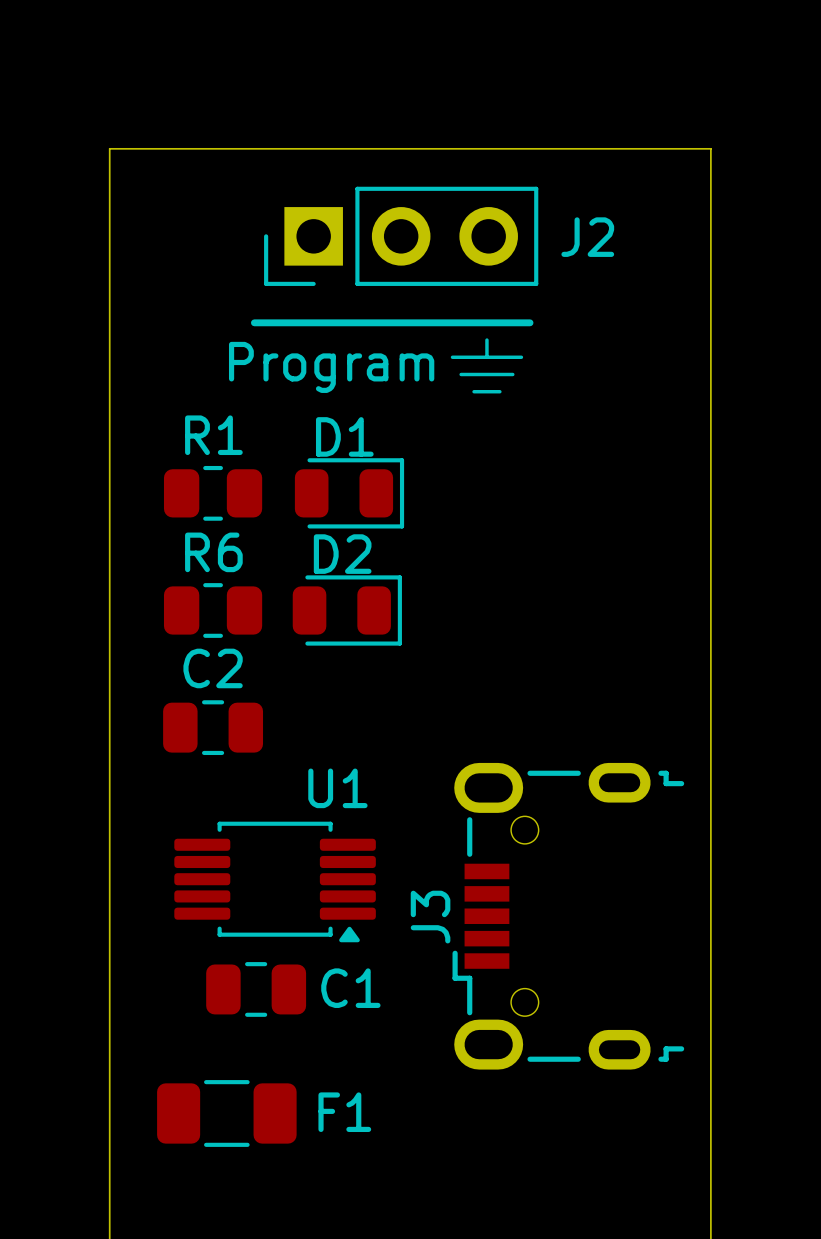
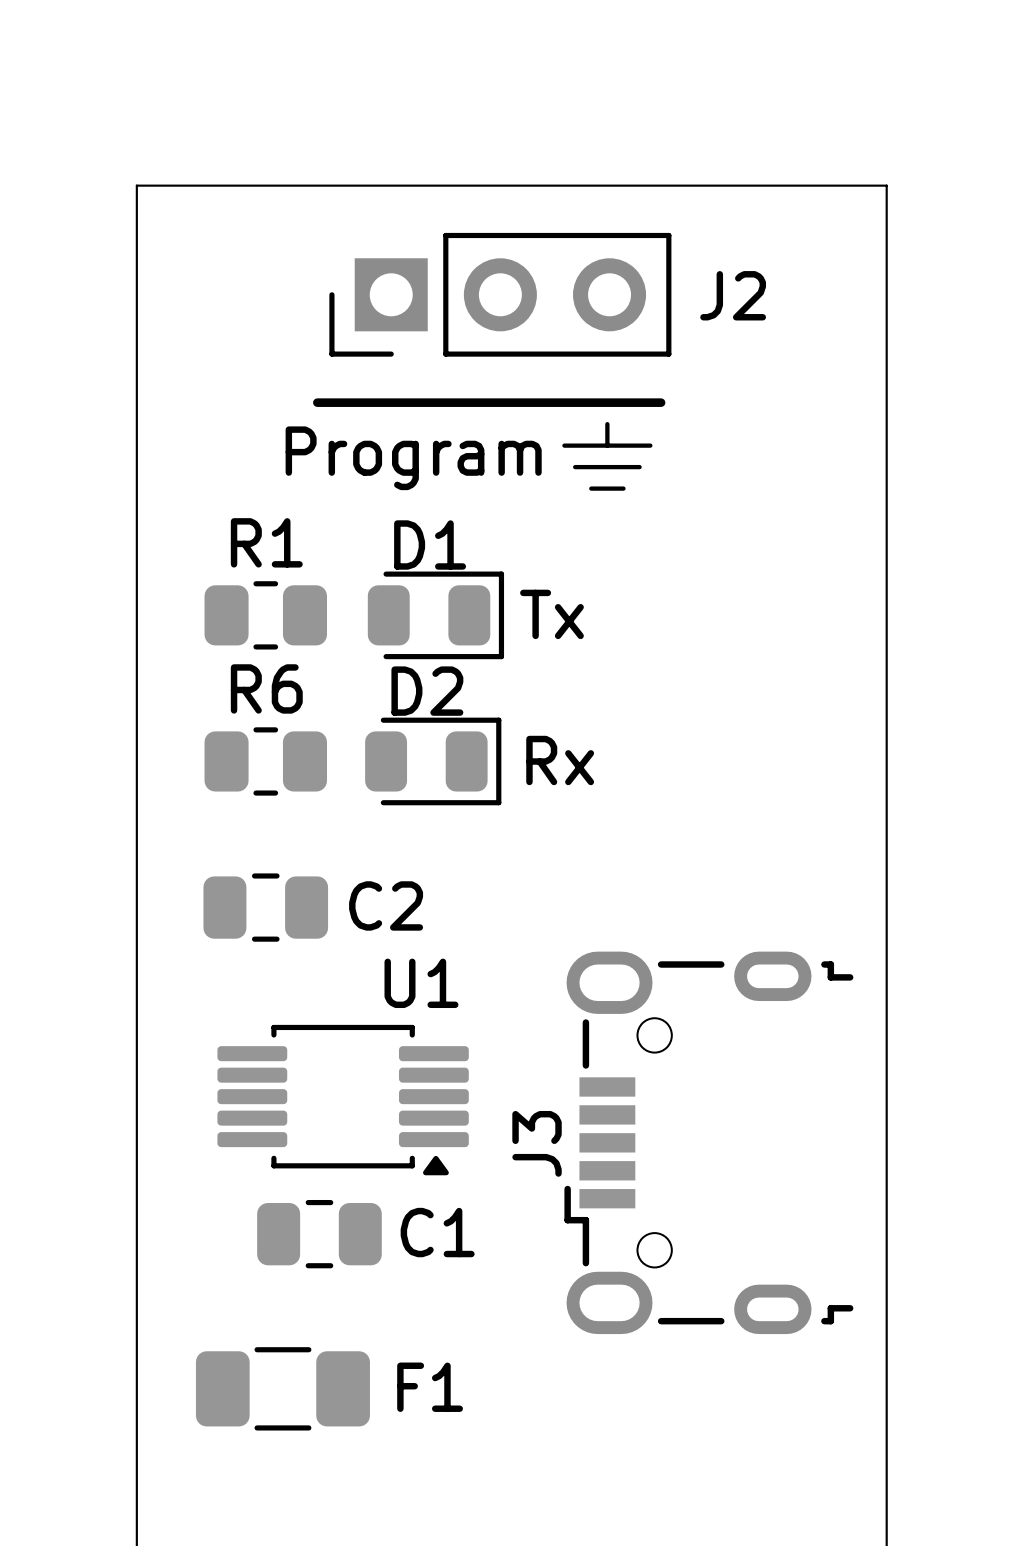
text: none -> Tx (551, 614)
text: none -> Rx (560, 760)
C2 name position: C2 (213, 668) -> C2 (386, 905)

